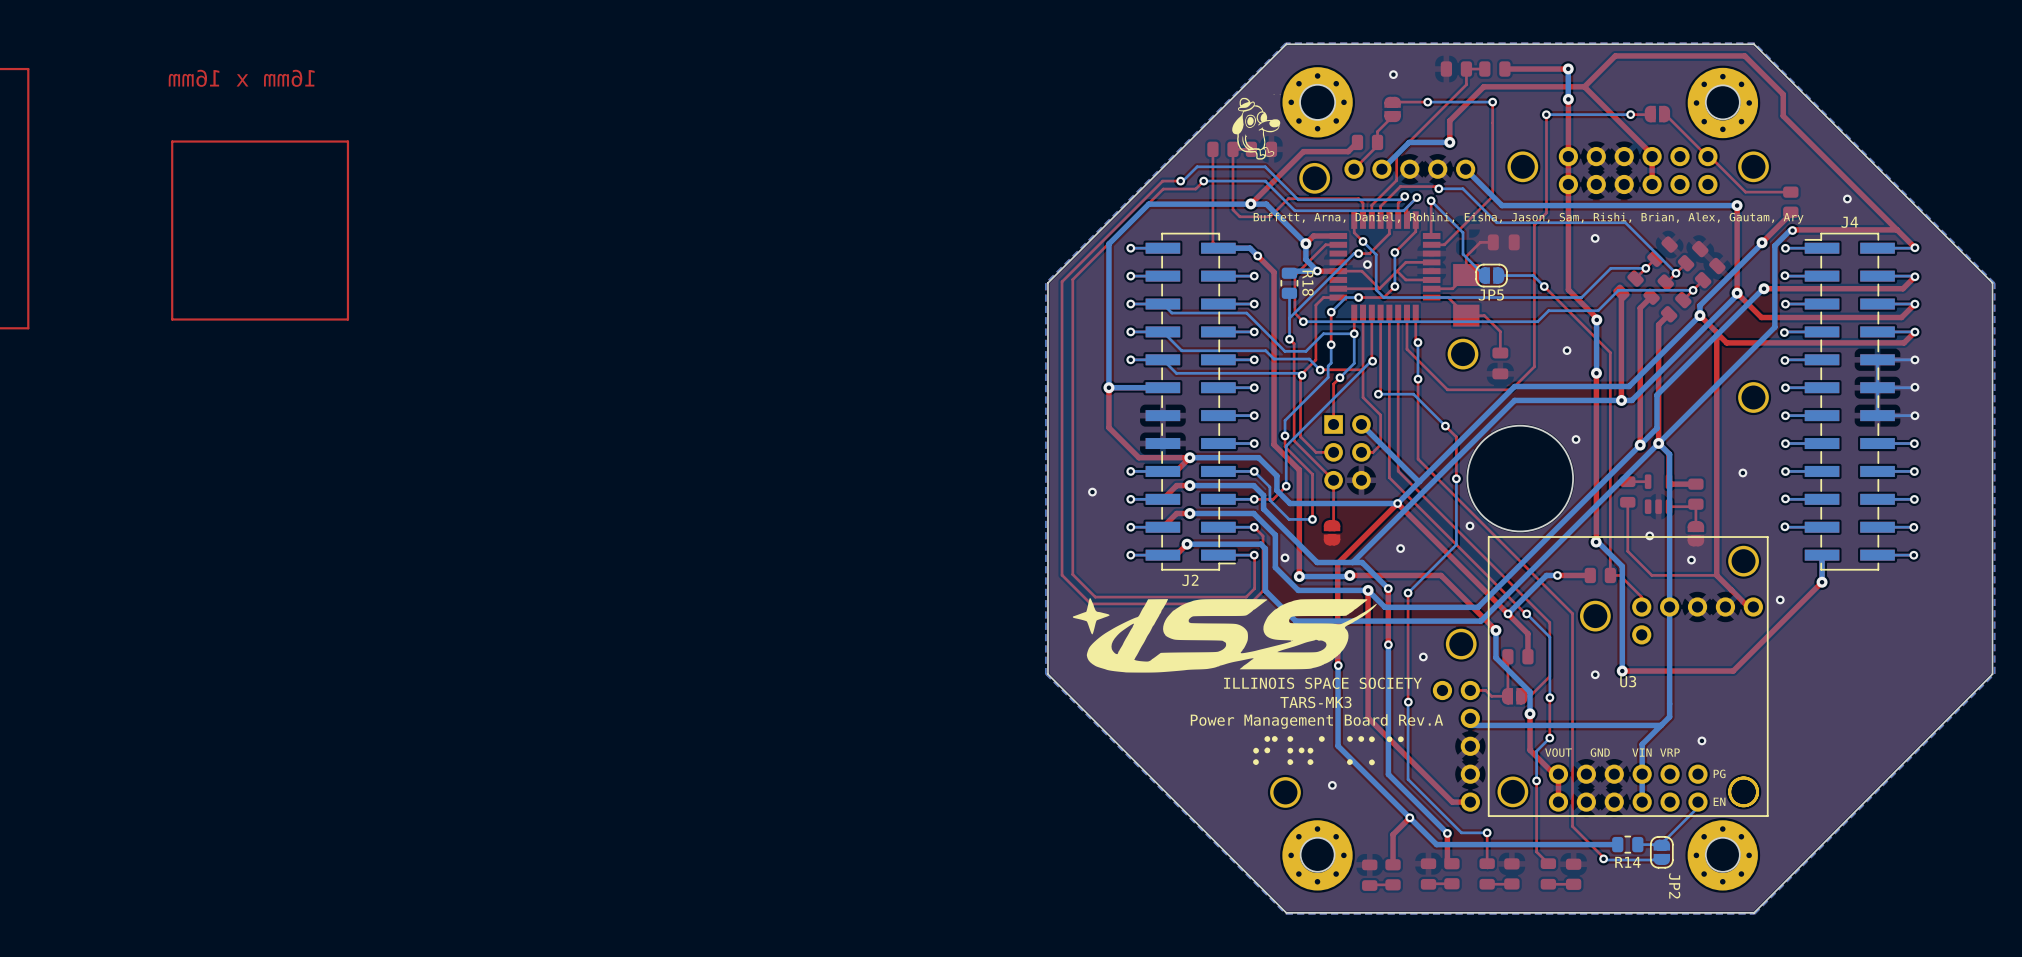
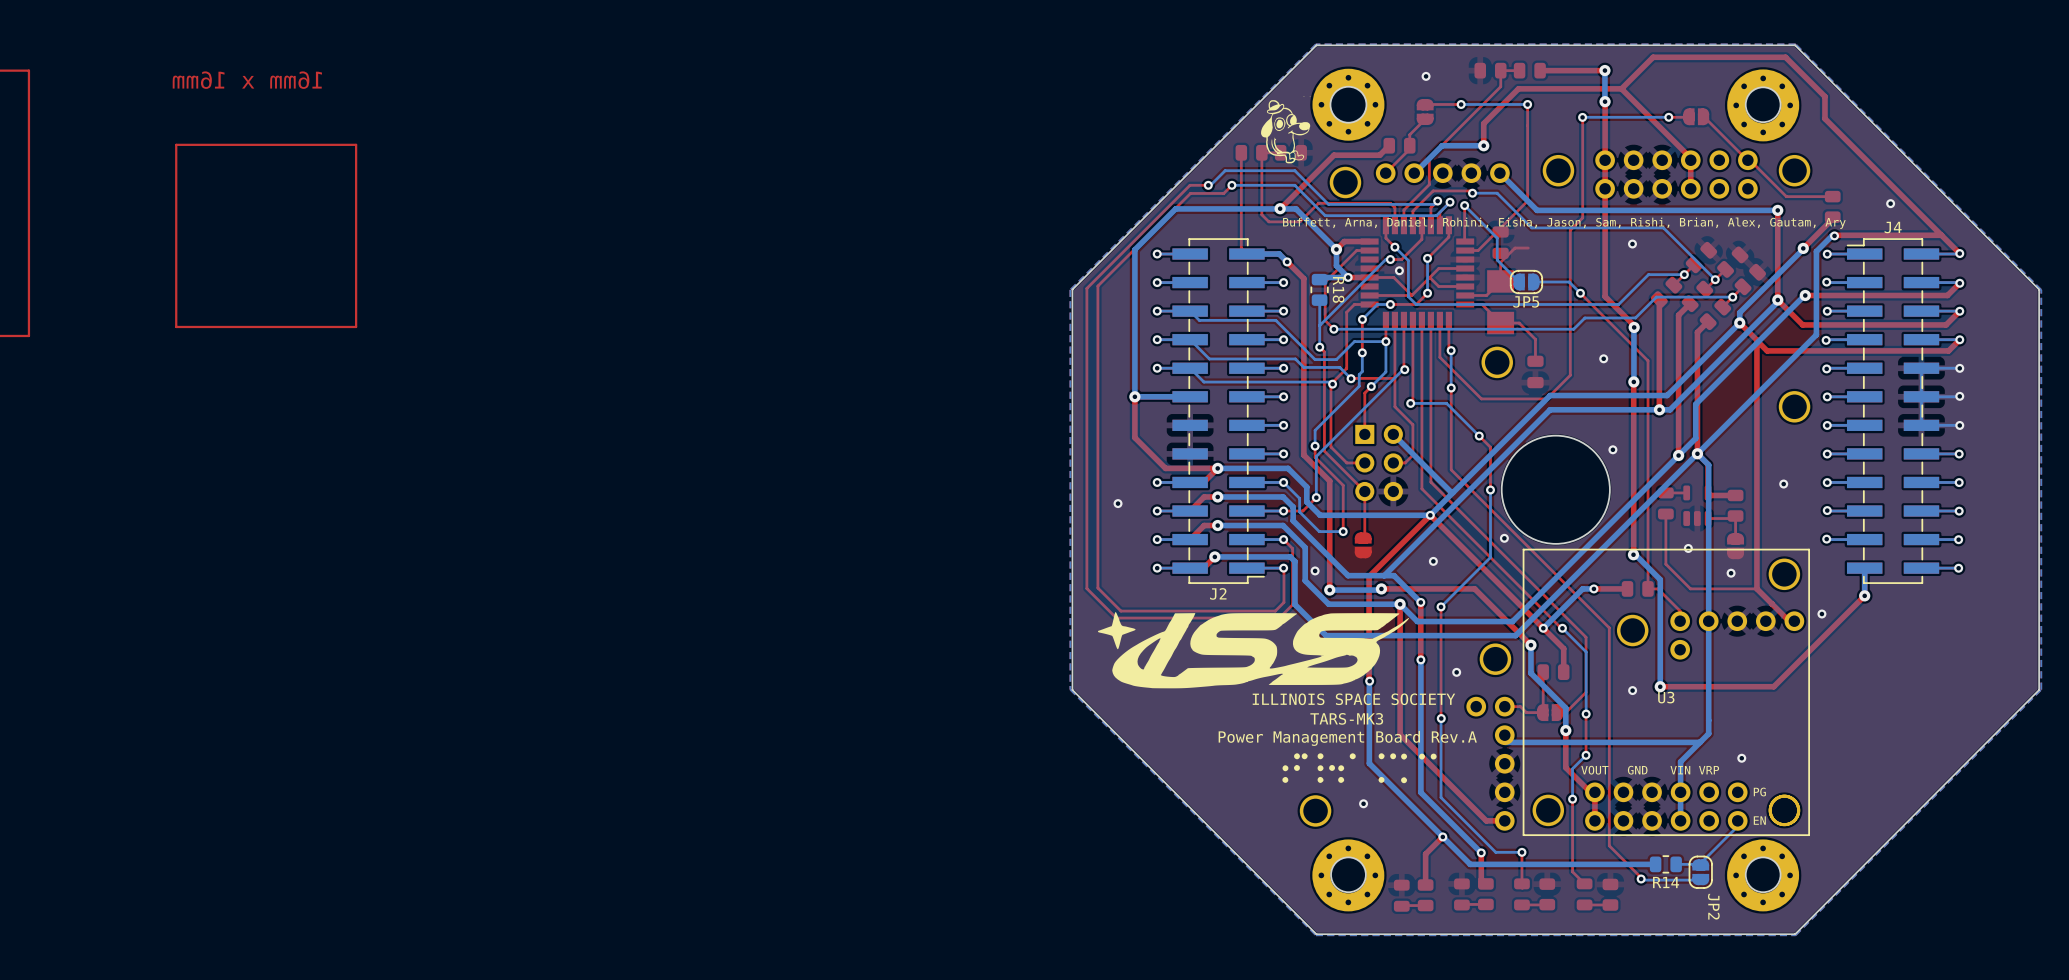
part rotation: 0° (1503, 242) -> 90° clockwise (1500, 242)
part position: (1503, 242) -> (1500, 242)

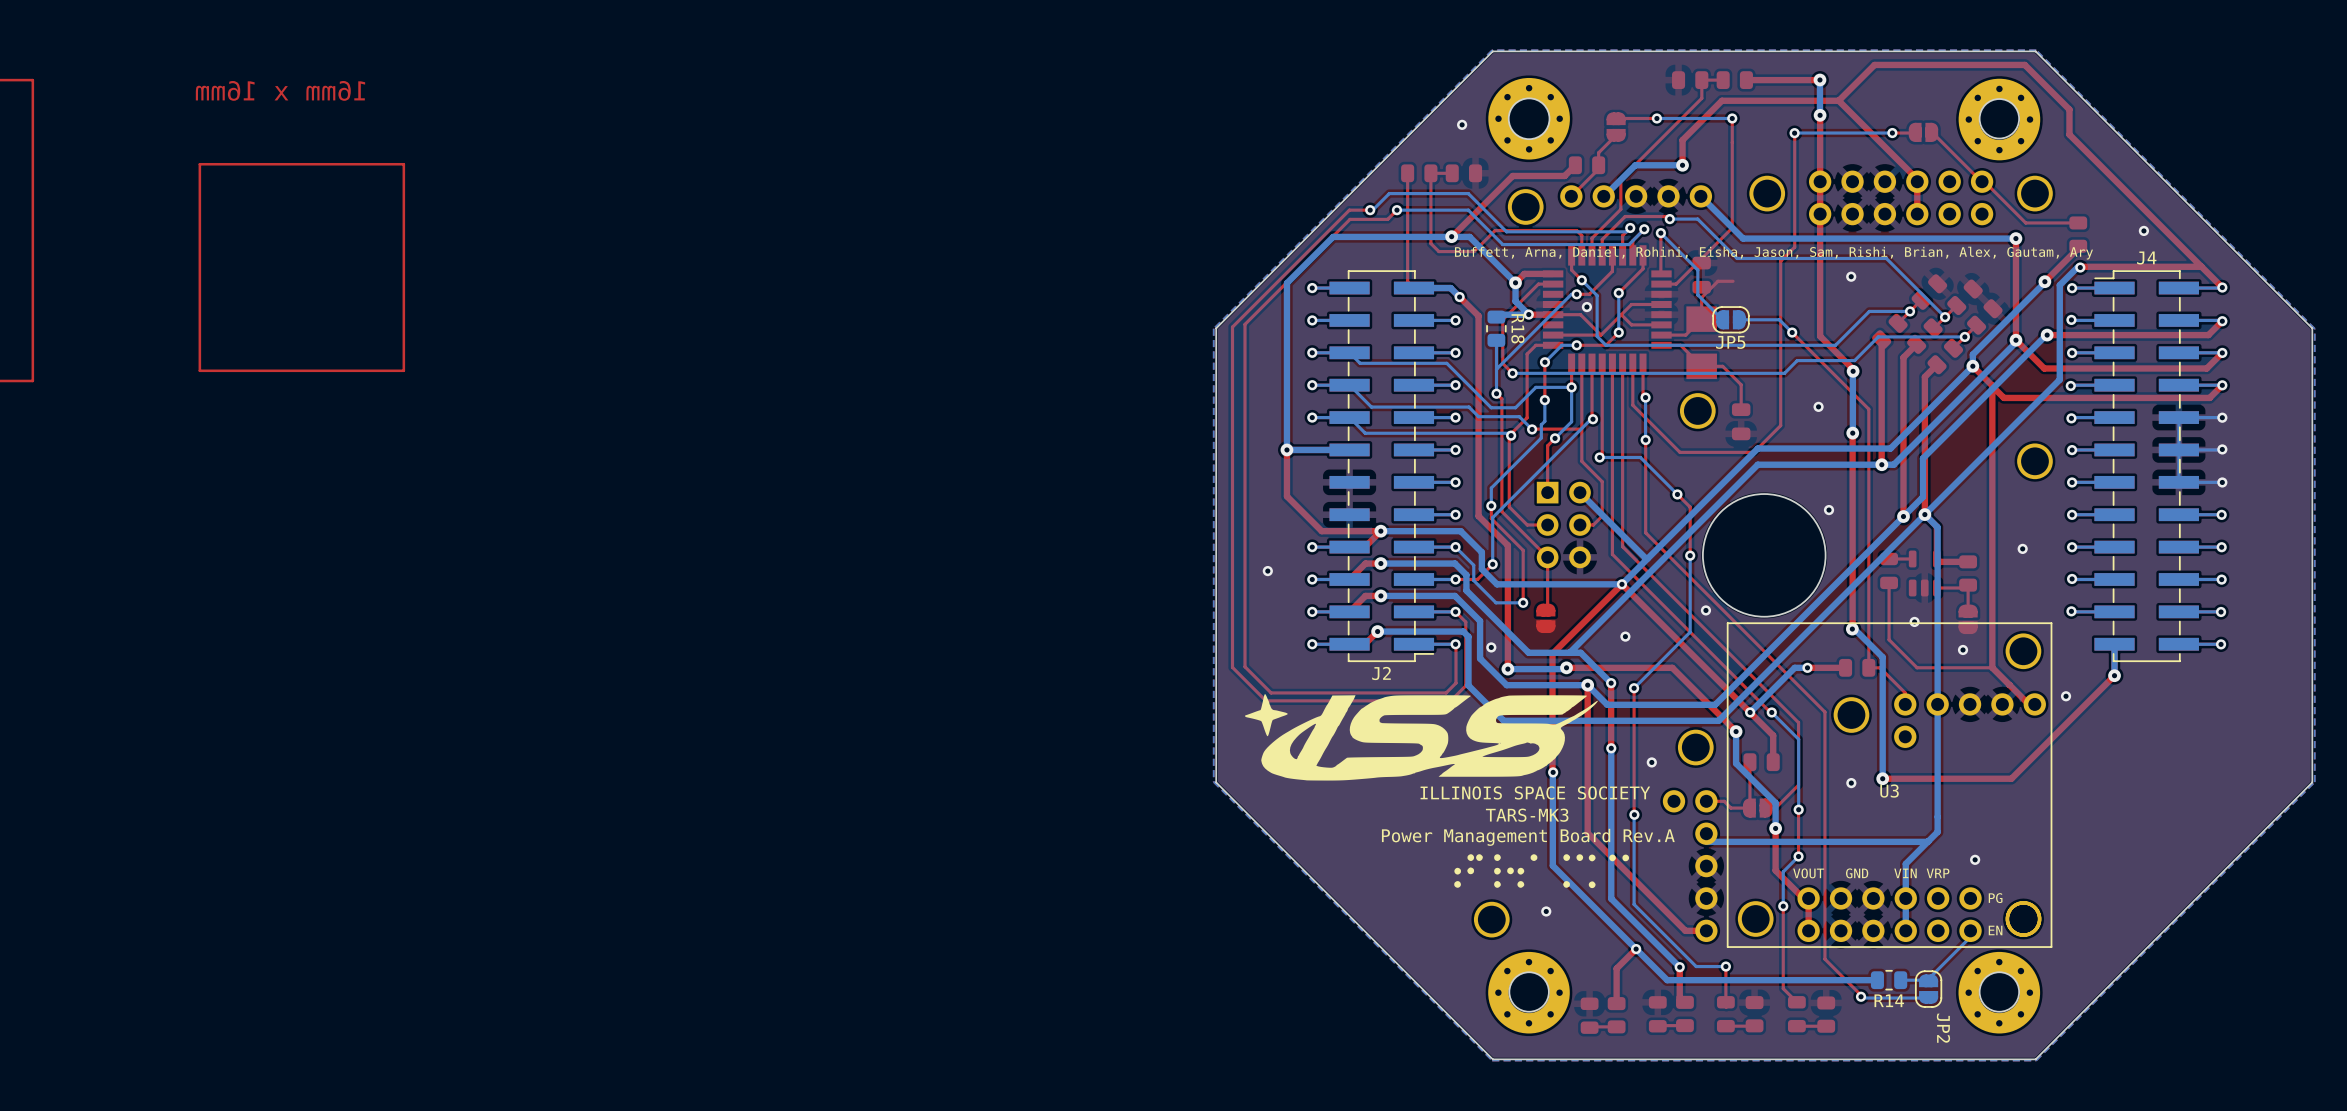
via: (1426, 76) -> none
drawing: [1261, 96, 1312, 164] -> none
via: none -> (1462, 124)

